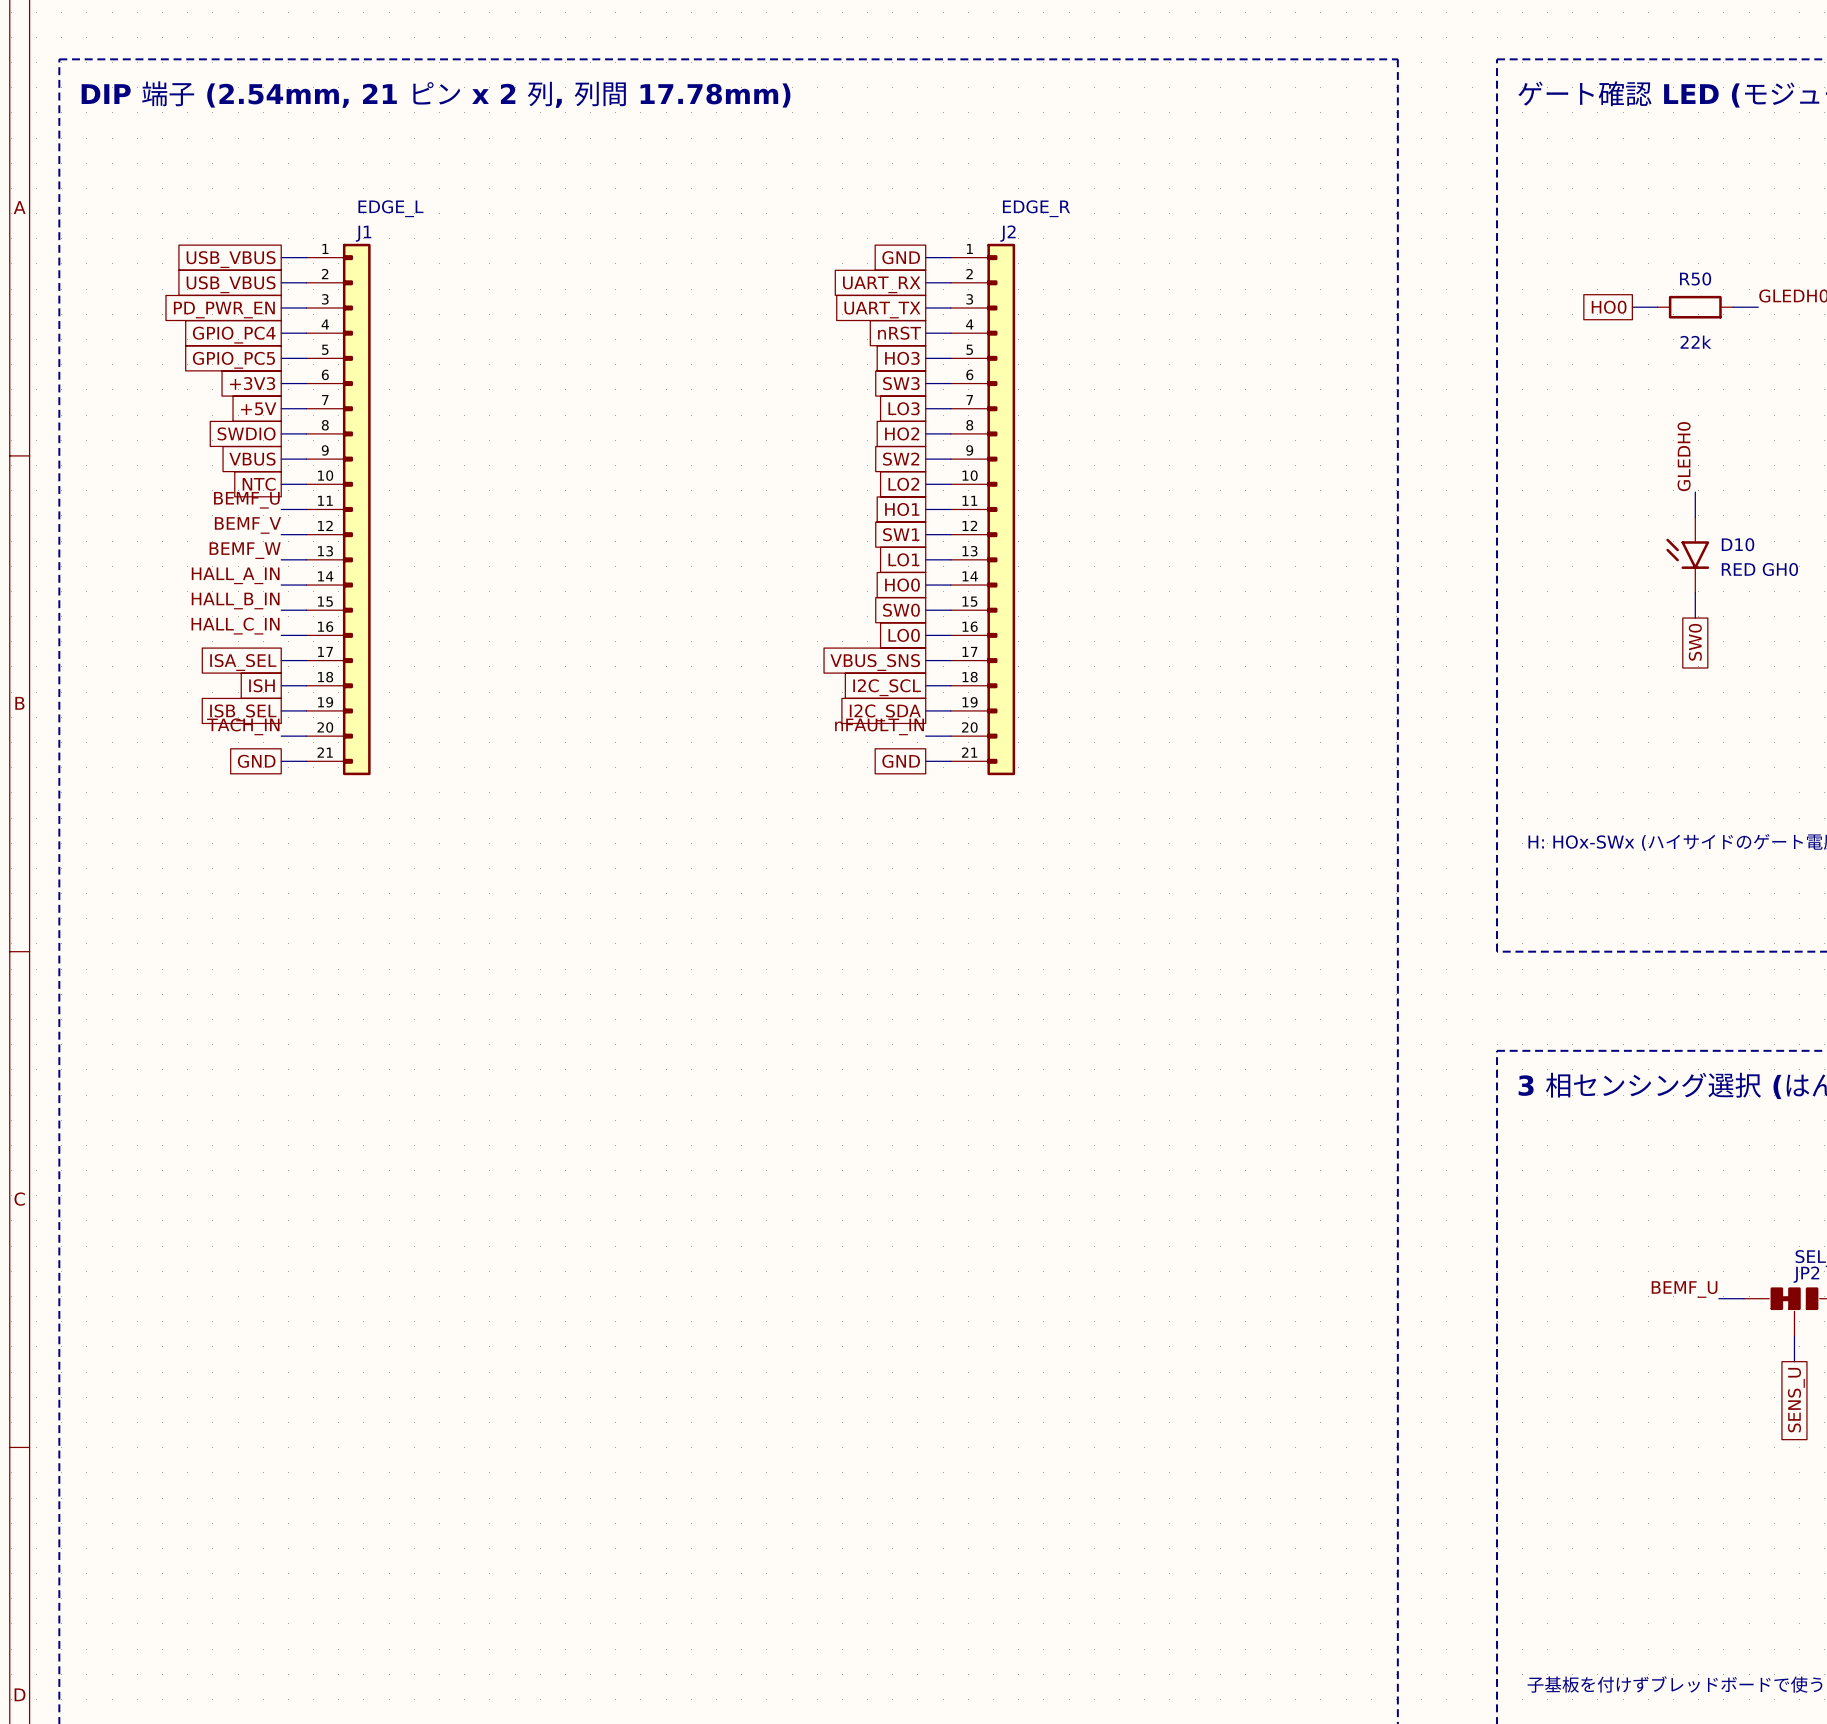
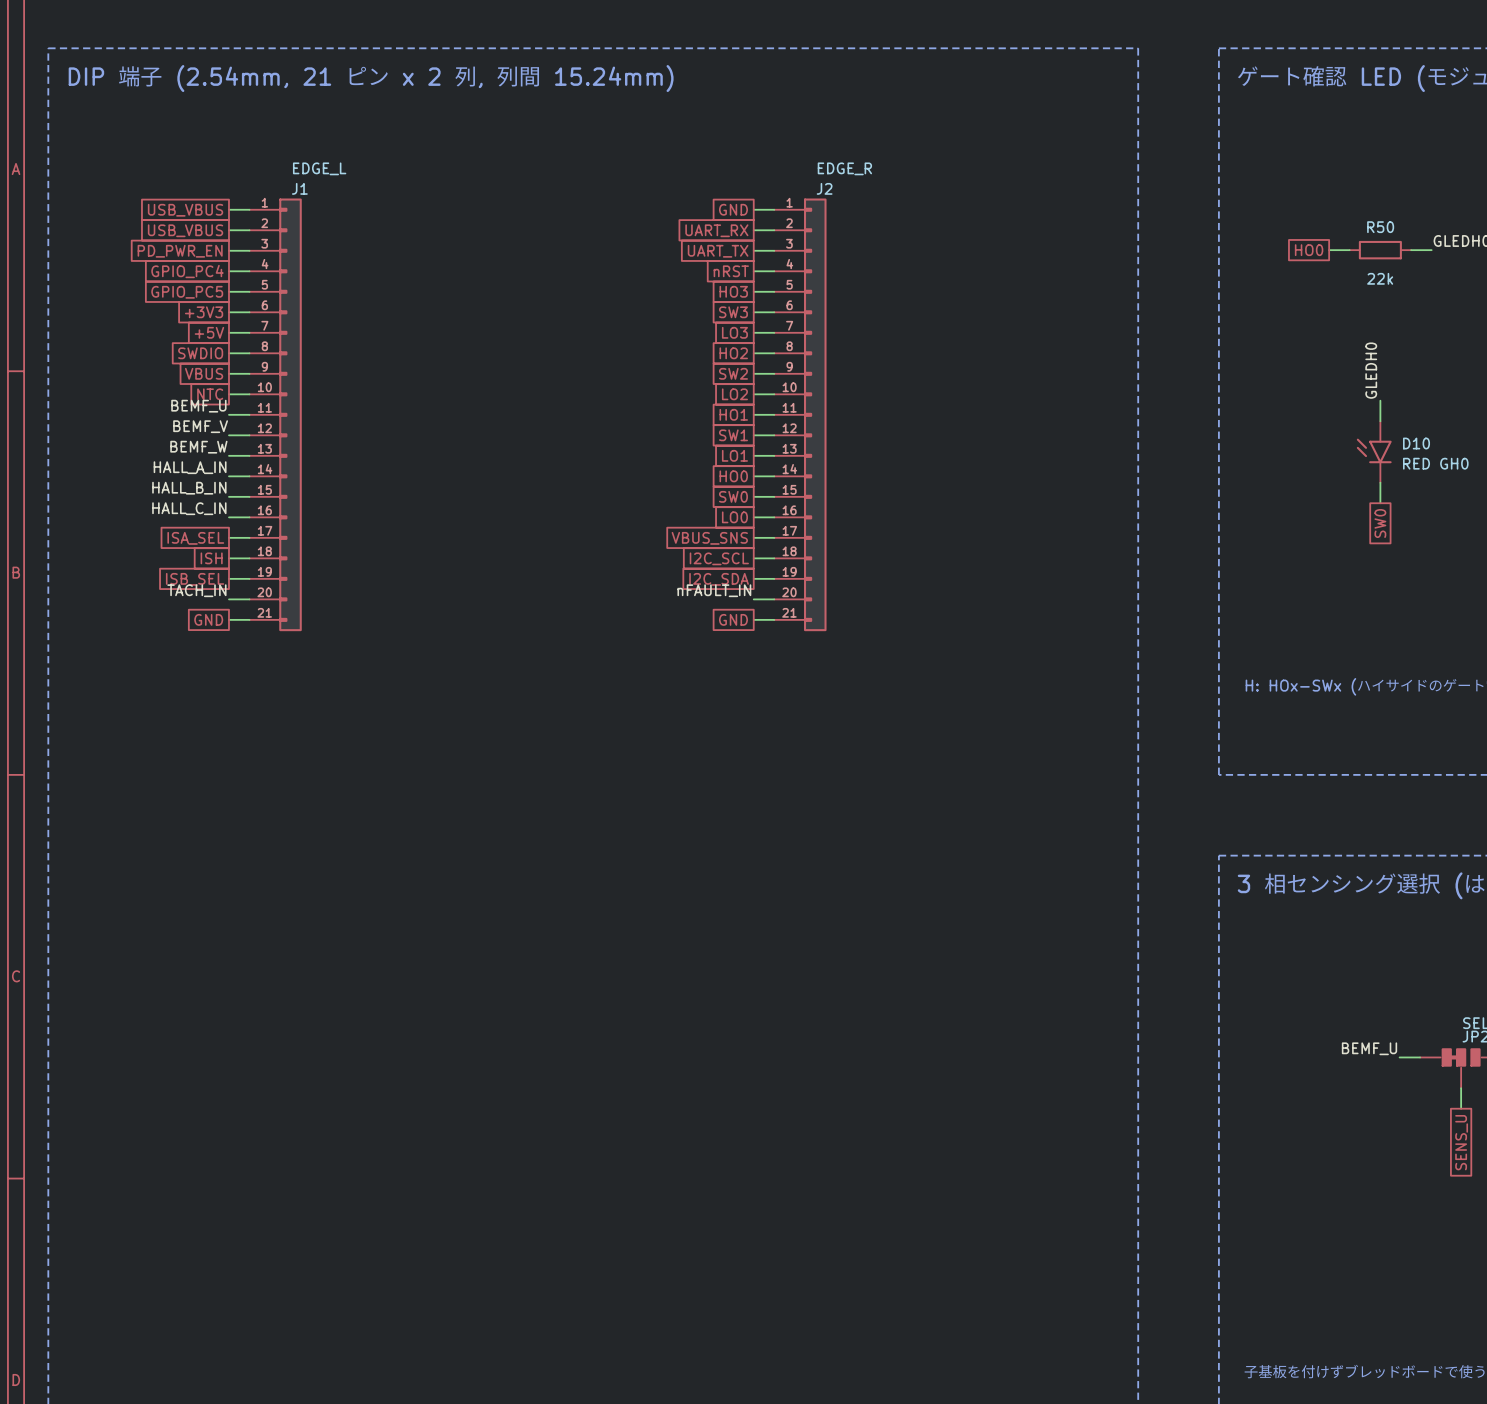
text: DIP 端子 (2.54mm, 21 ピン x 2 列, 列間 17.78mm) (436, 94) -> DIP 端子 (2.54mm, 21 ピン x 2 列, 列間 15.24mm) (371, 78)

